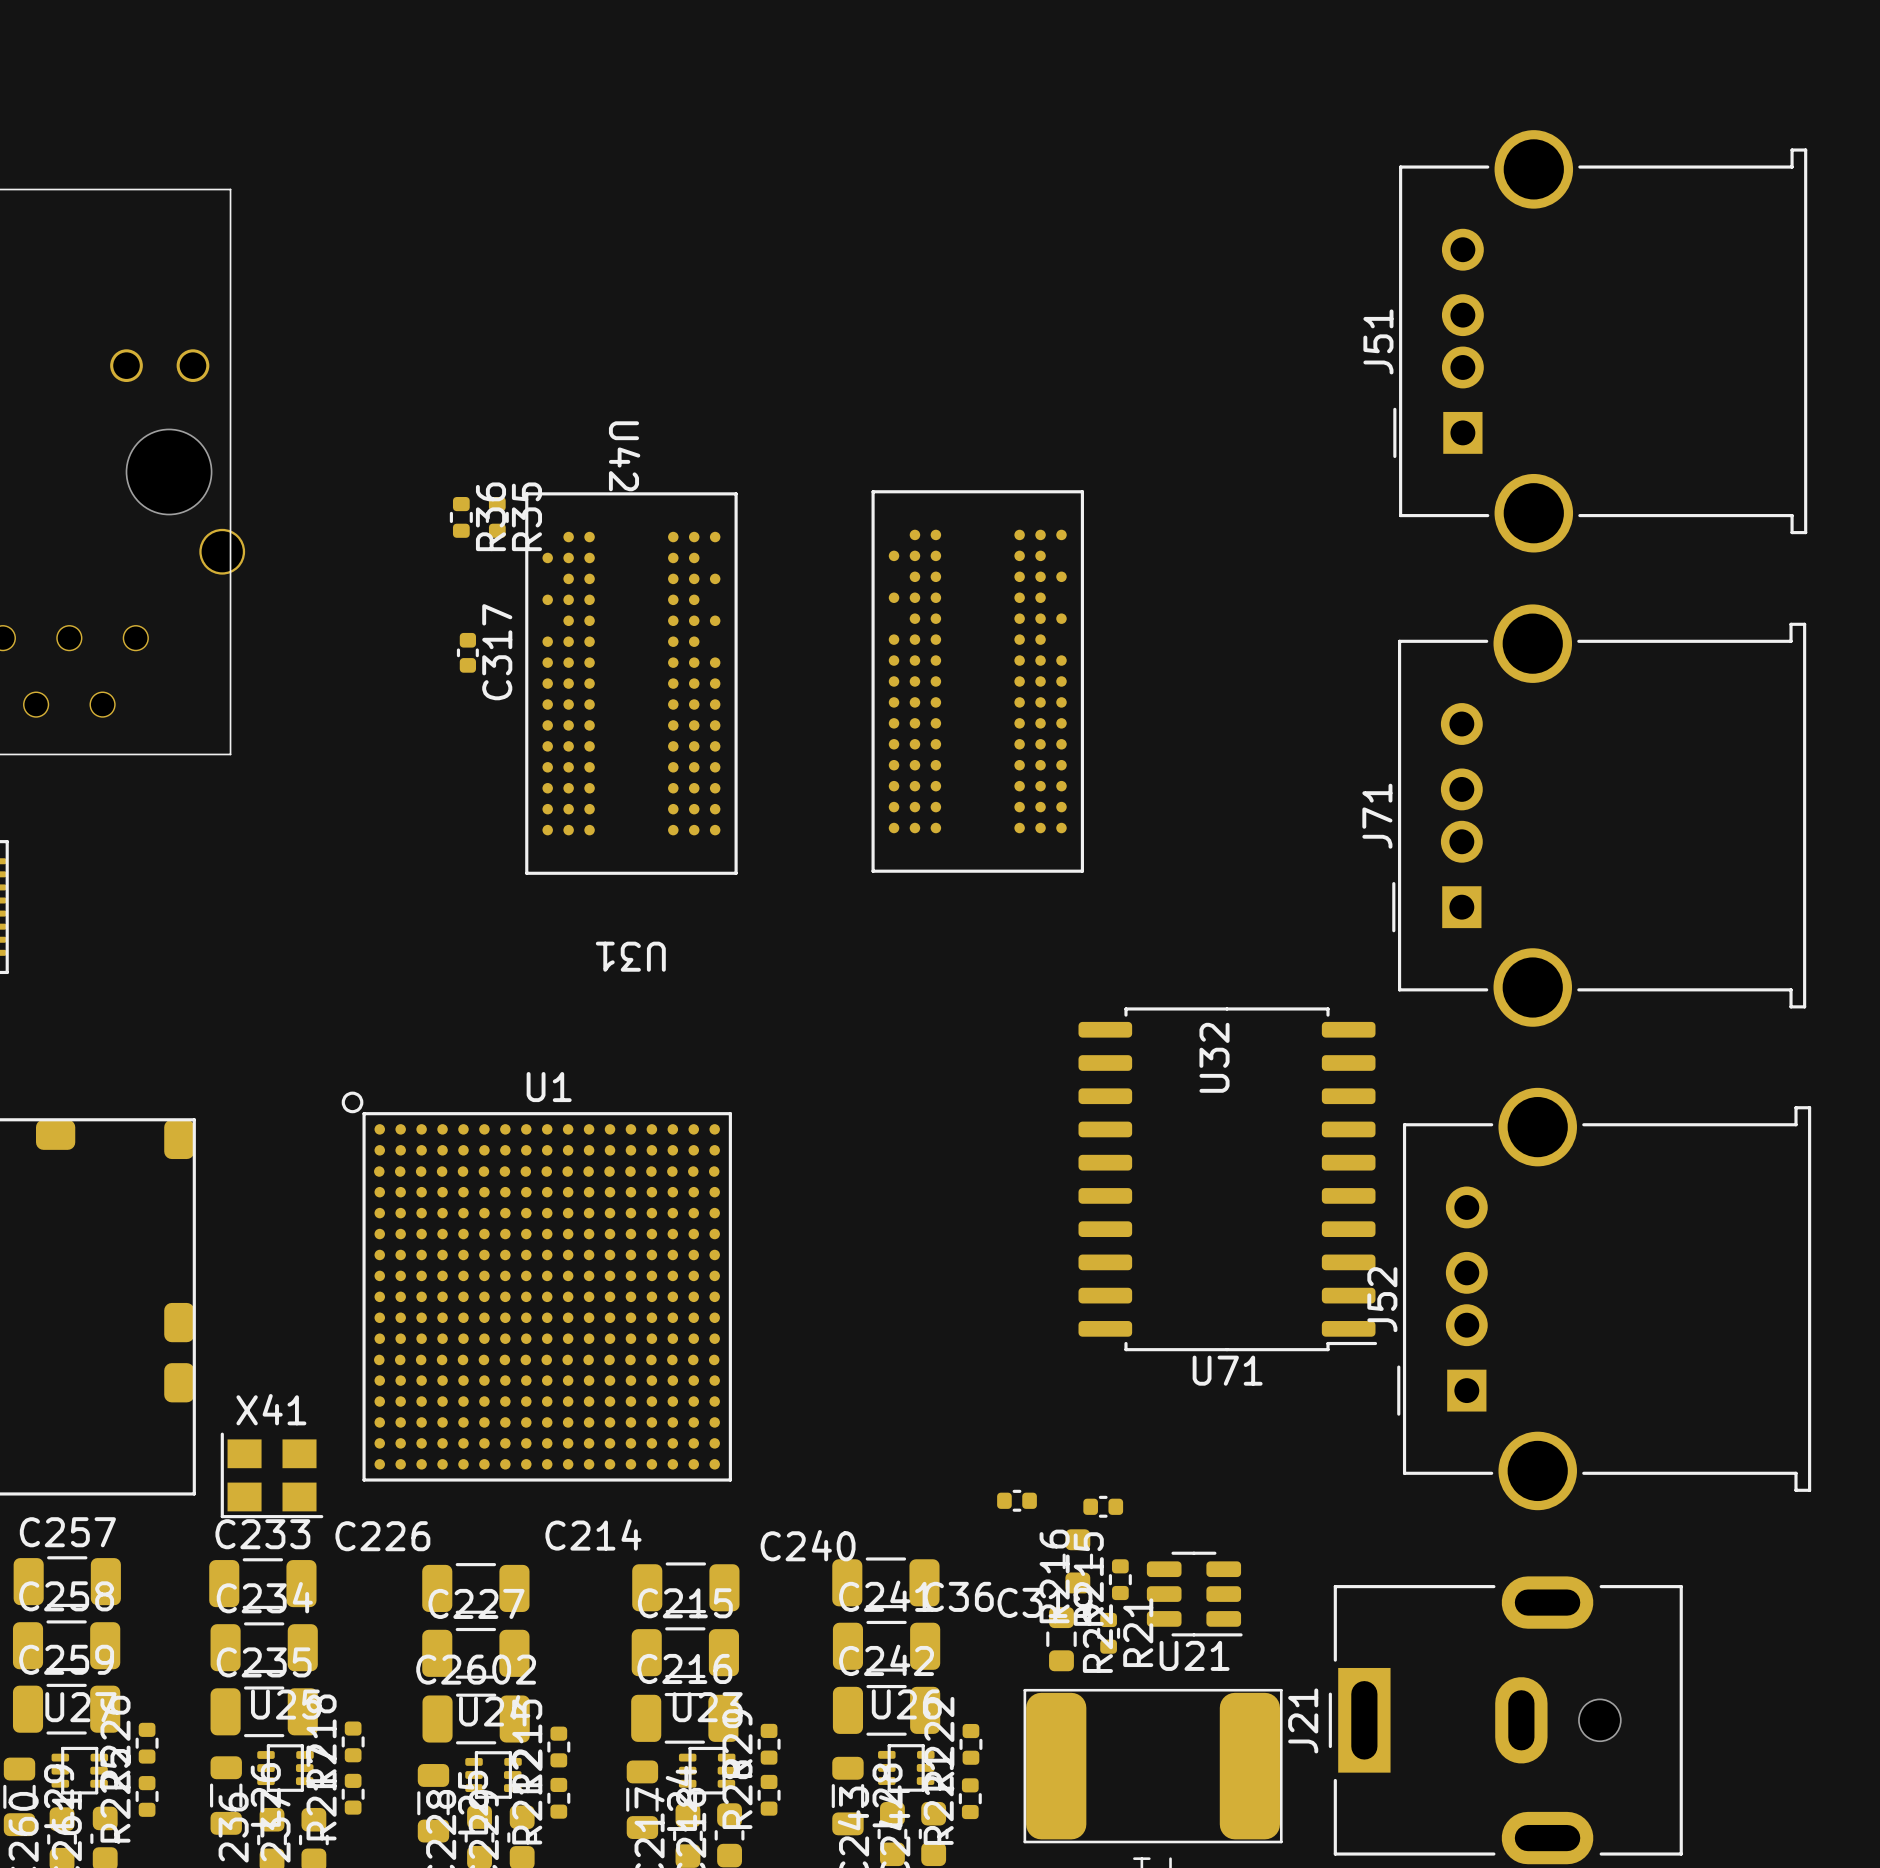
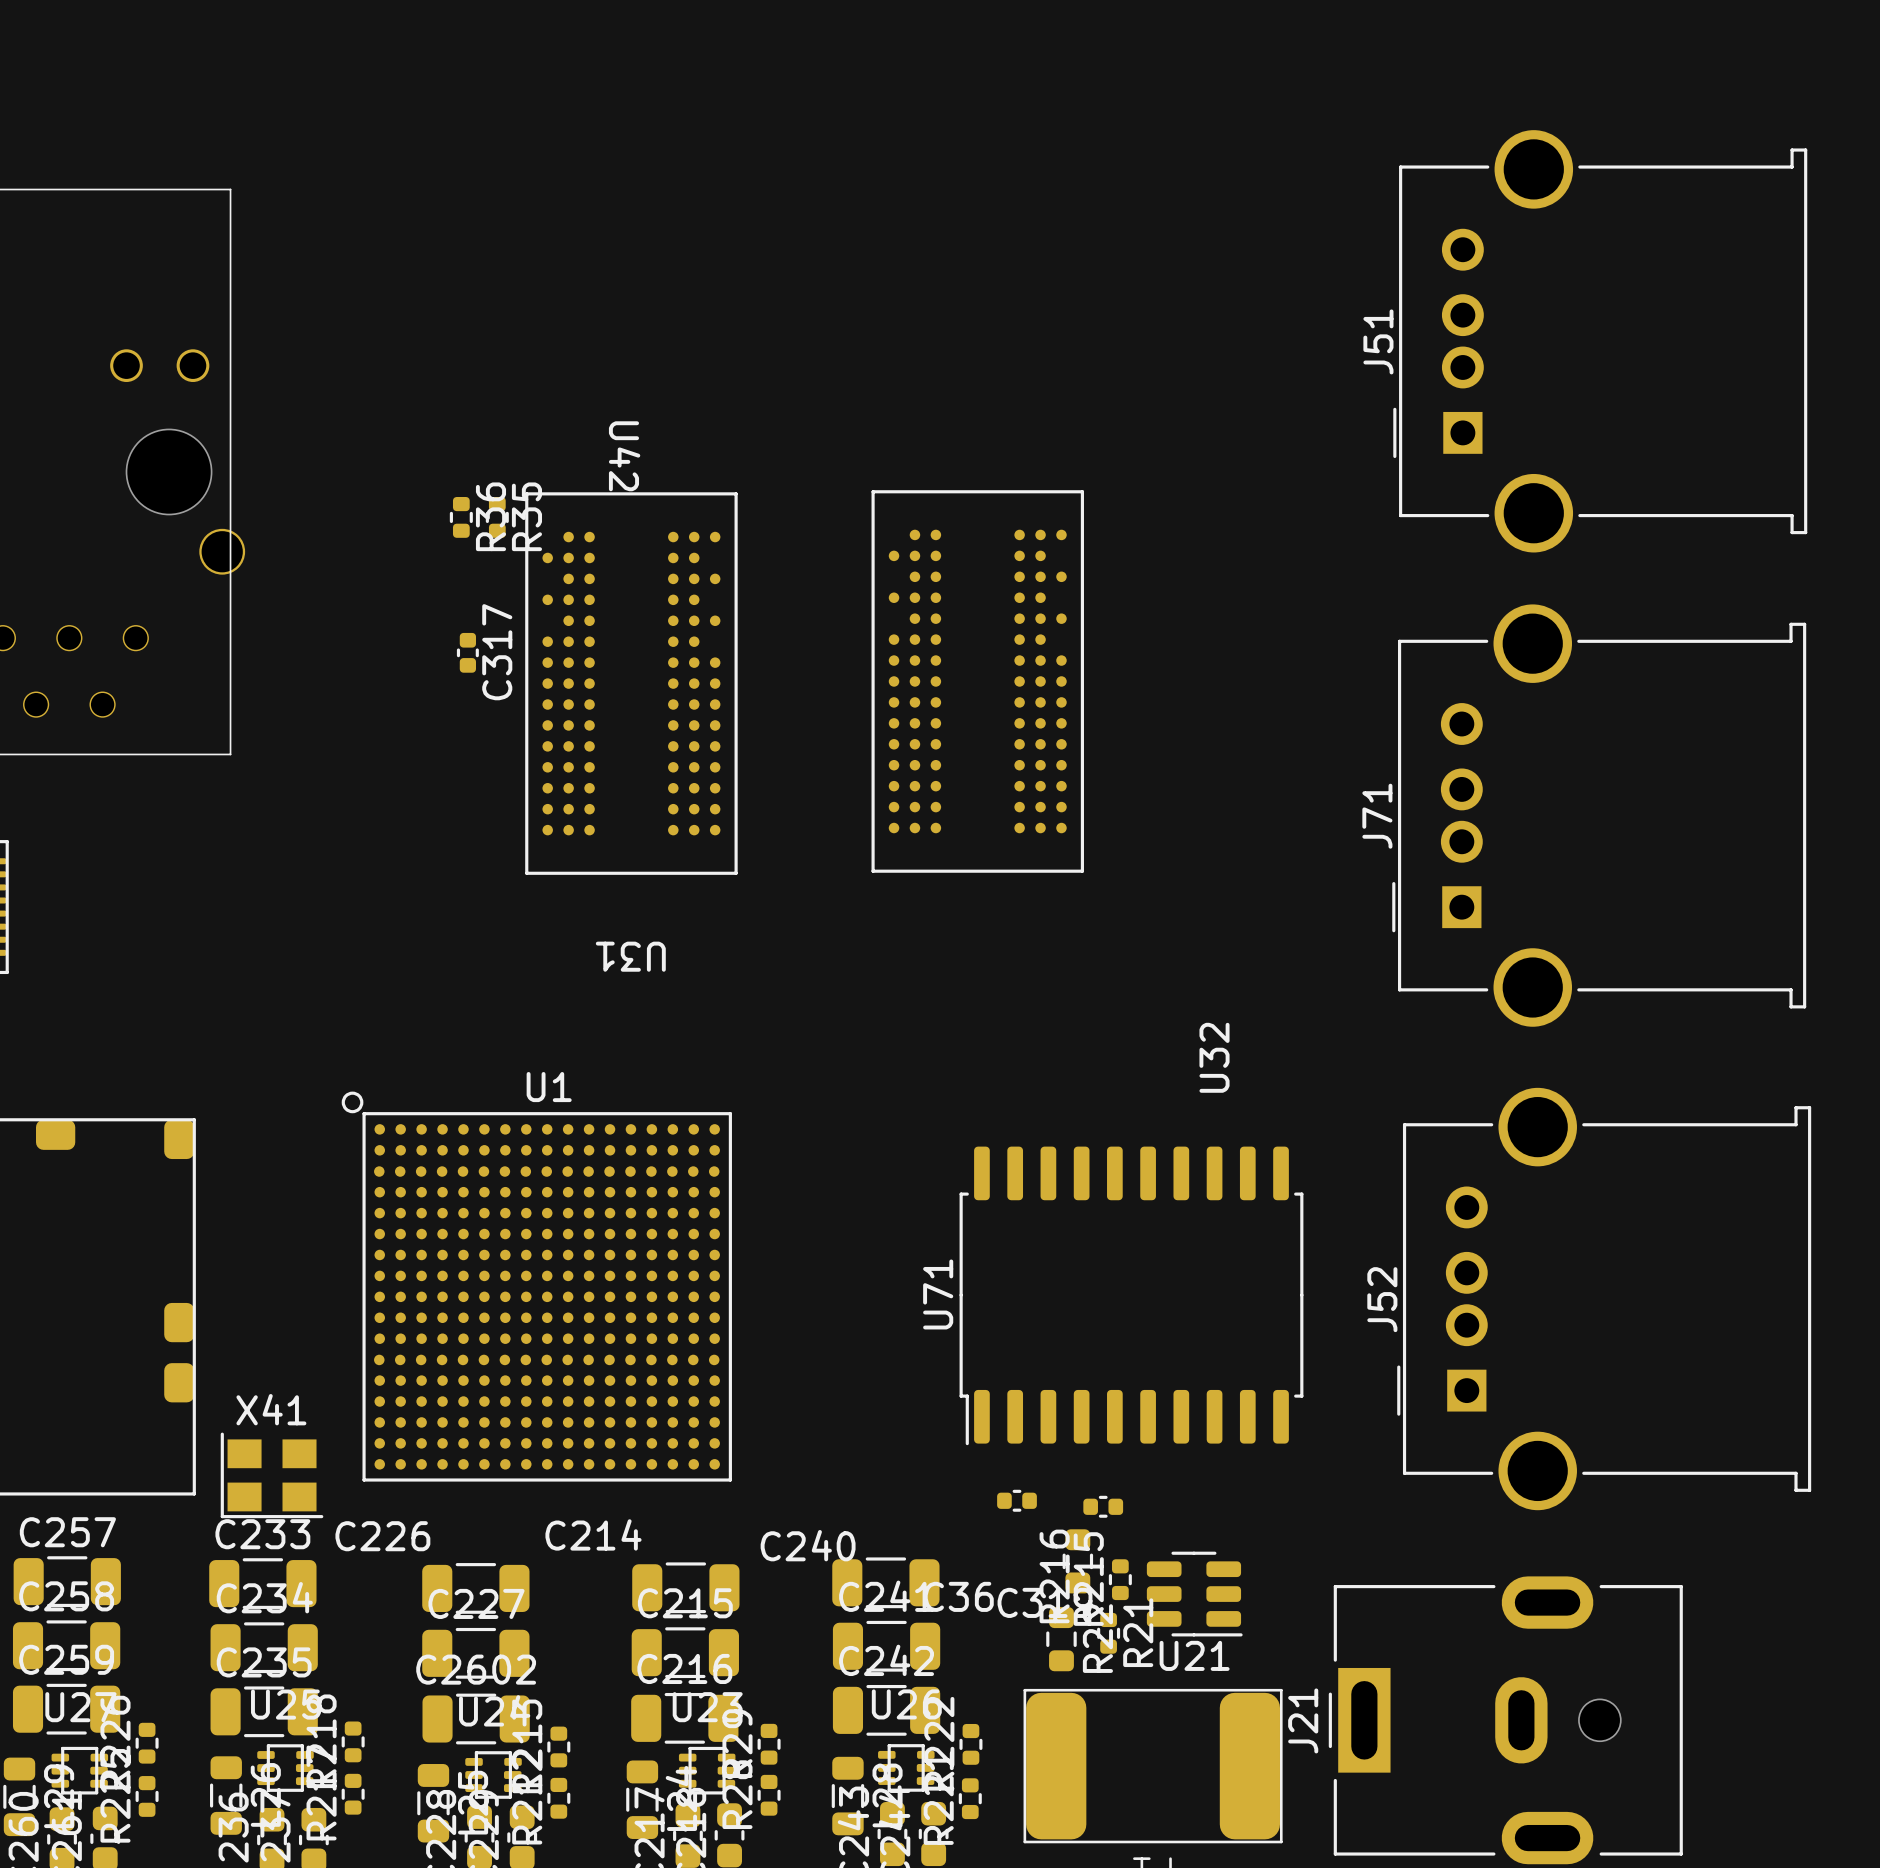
U71 rotation: 0° (1227, 1179) -> 90° clockwise (1131, 1295)

